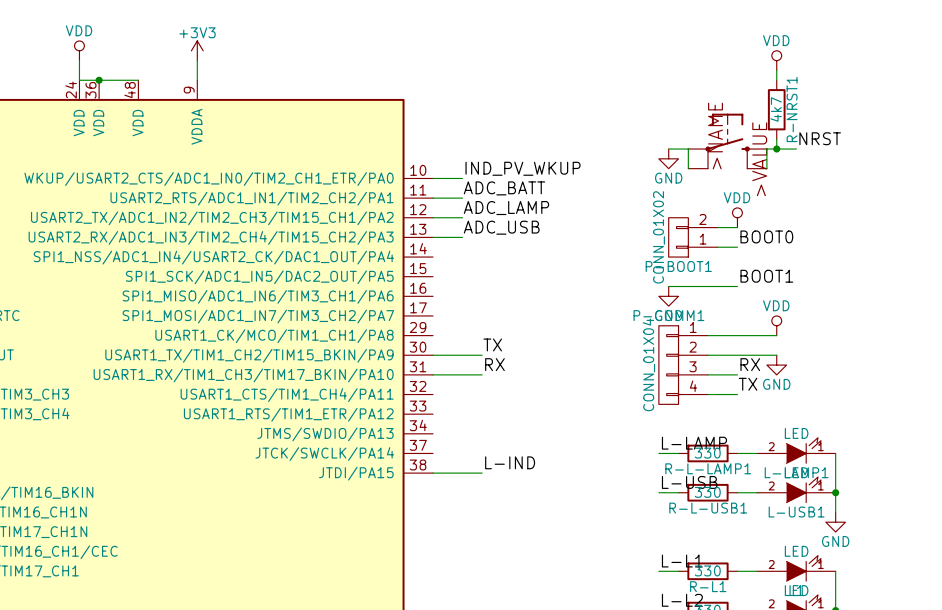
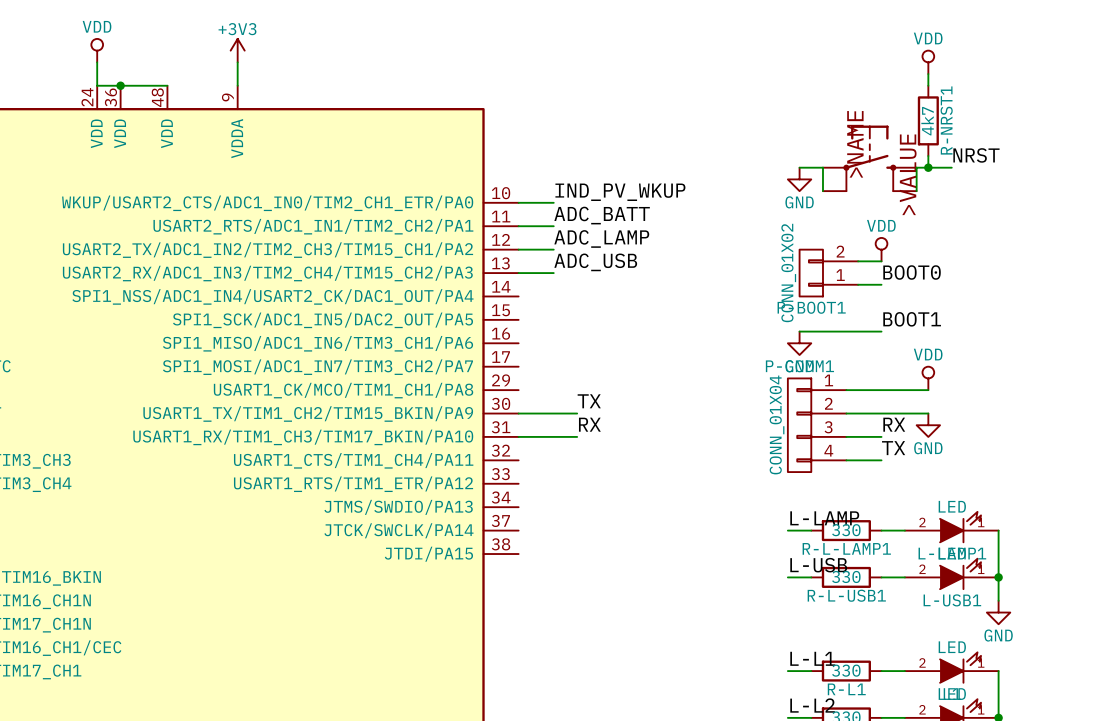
label: L-IND (510, 462) -> none
wire: (433, 473) (482, 473) -> none

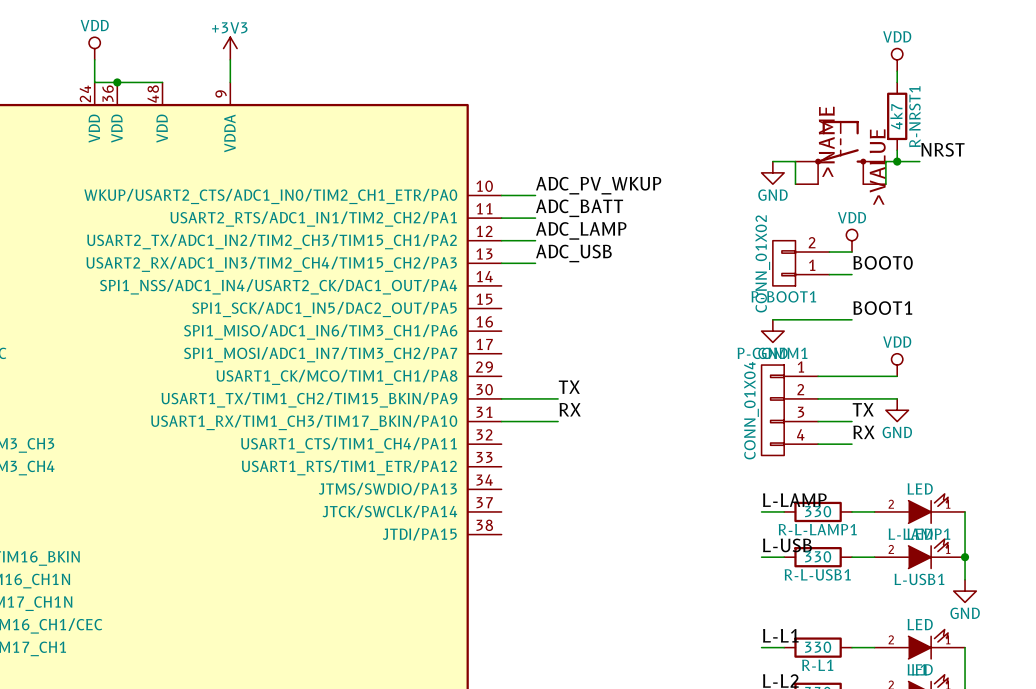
label: IND_PV_WKUP (620, 192) -> ADC_PV_WKUP (598, 185)
label: RX (894, 424) -> TX (863, 409)
label: TX (893, 448) -> RX (863, 432)

